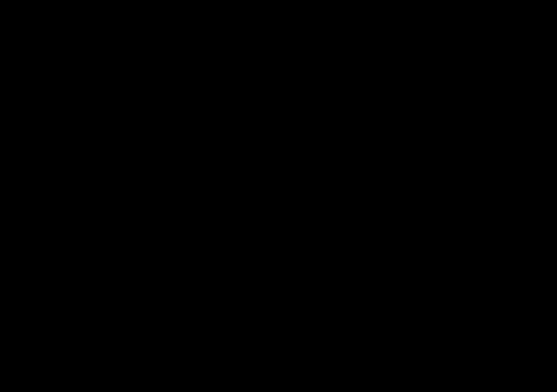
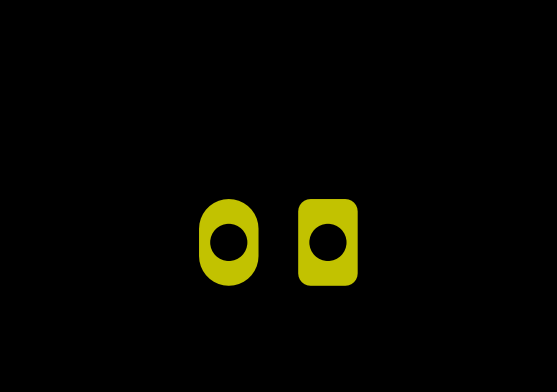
part: none -> (278, 242)

